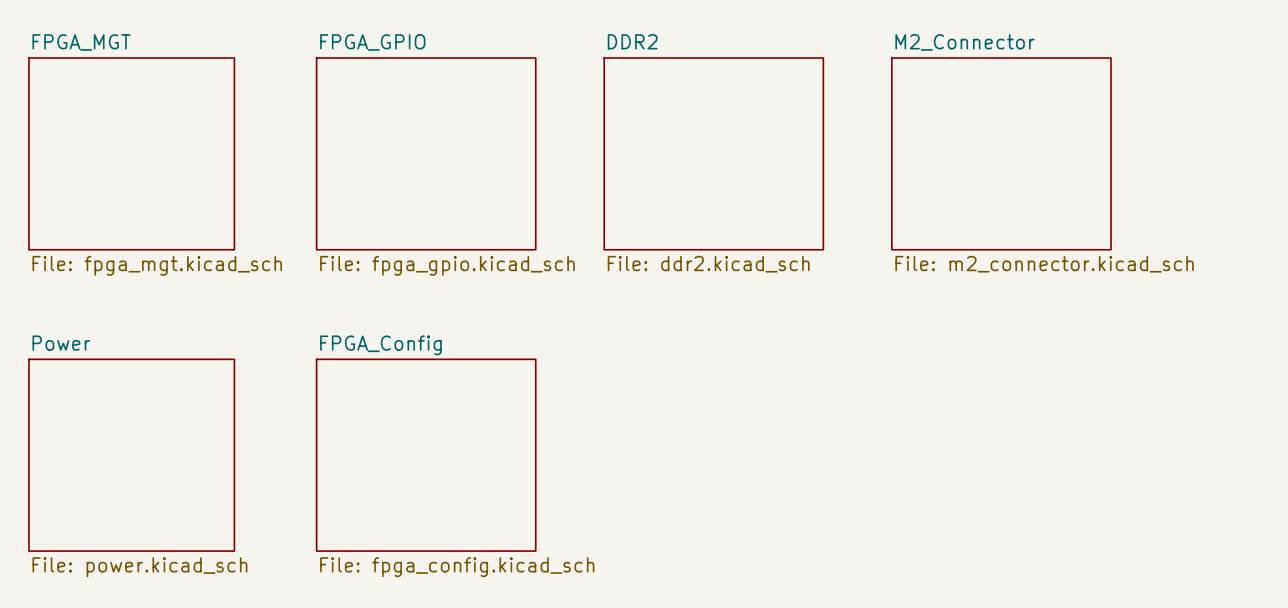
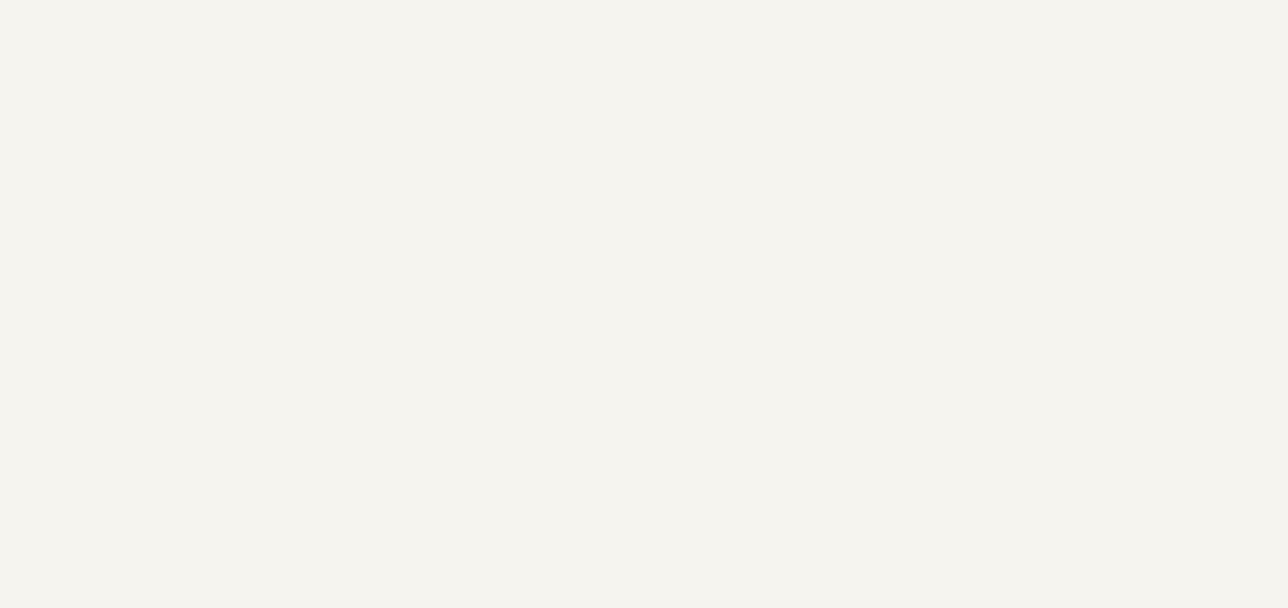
sheet FPGA_MGT: File: fpga_mgt.kicad_sch (131, 153) -> none
sheet FPGA_GPIO: File: fpga_gpio.kicad_sch (426, 153) -> none
sheet DDR2: File: ddr2.kicad_sch (713, 153) -> none
sheet M2_Connector: File: m2_connector.kicad_sch (1001, 153) -> none
sheet Power: File: power.kicad_sch (131, 455) -> none
sheet FPGA_Config: File: fpga_config.kicad_sch (426, 455) -> none

